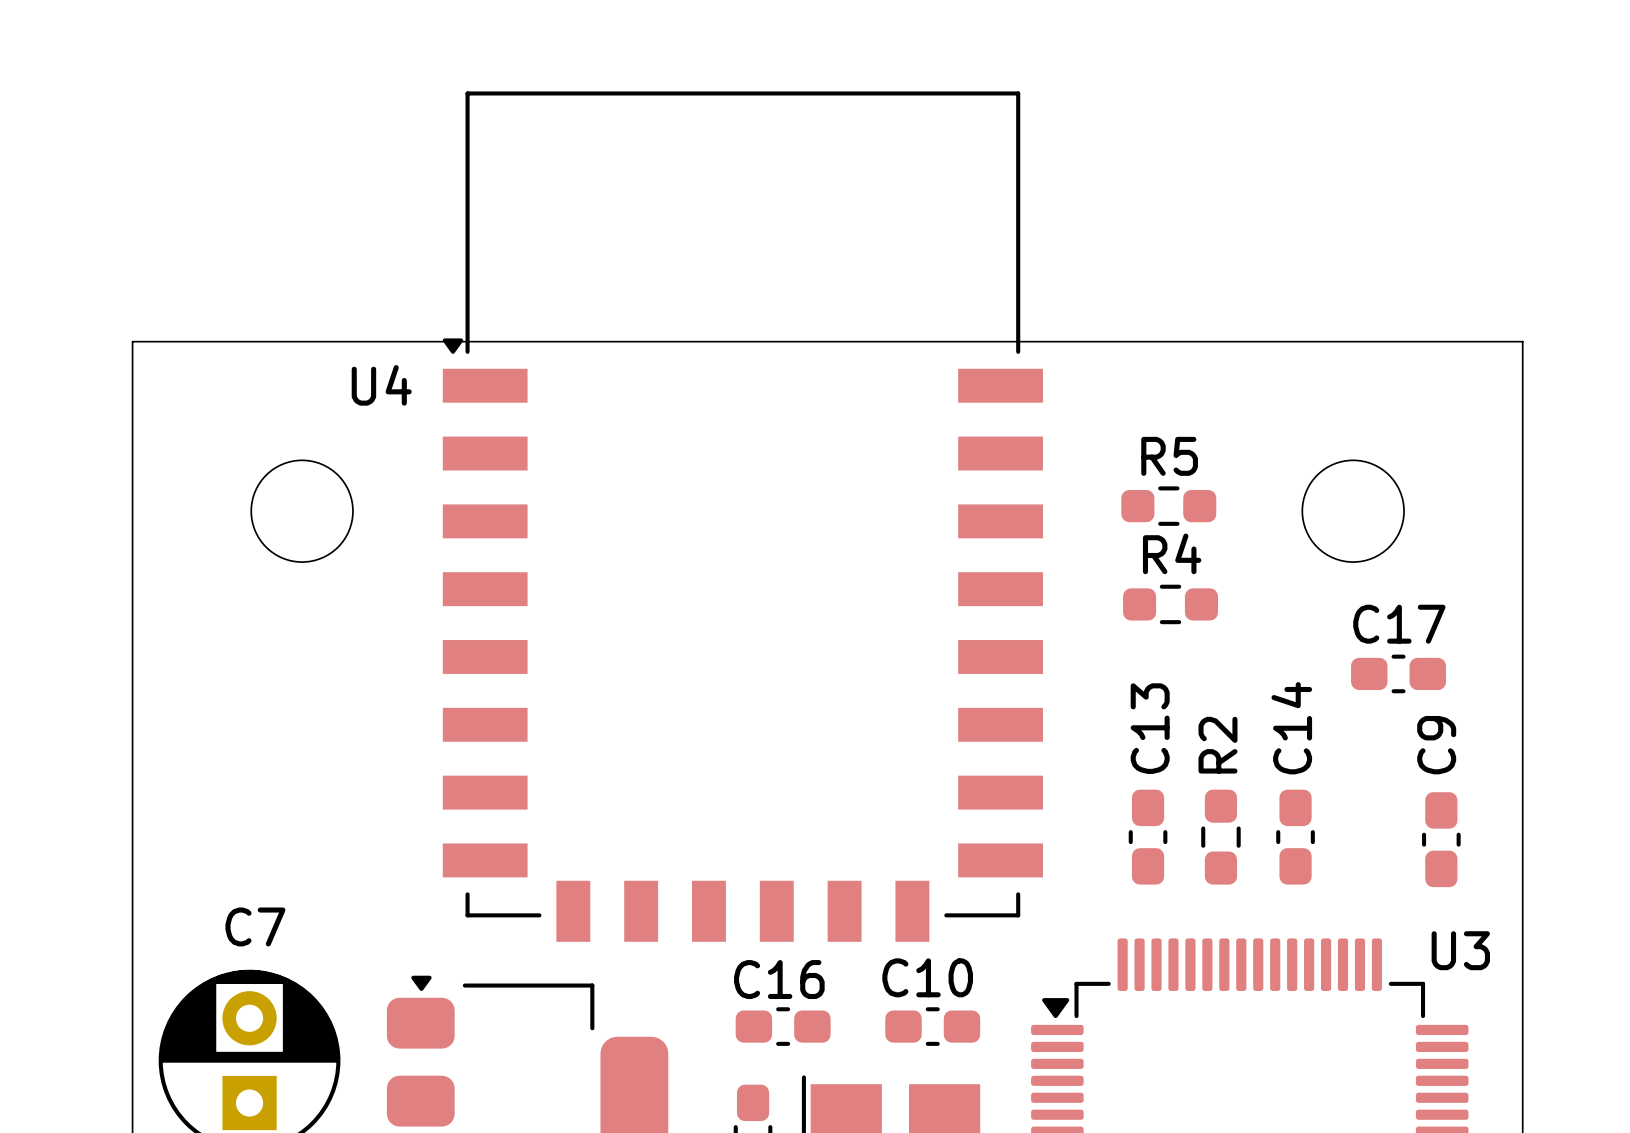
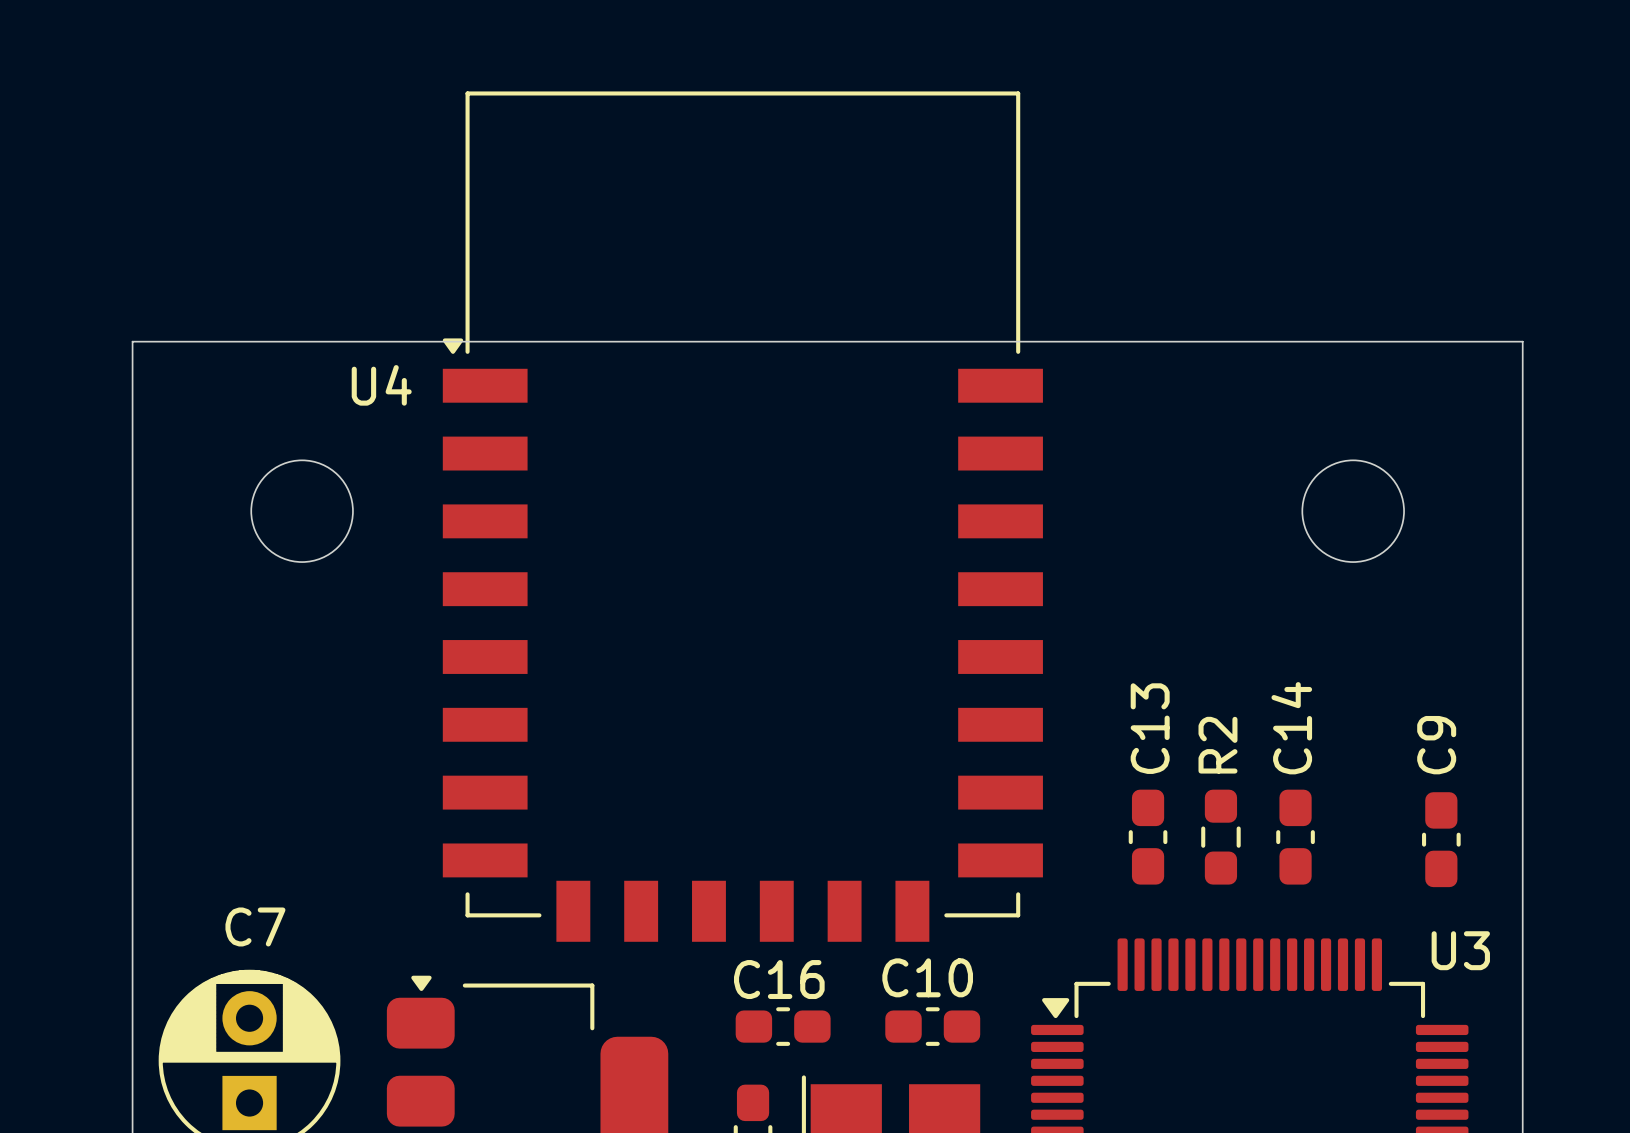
R5: (1168, 506) -> none
R4: (1170, 604) -> none
C17: (1398, 673) -> none

